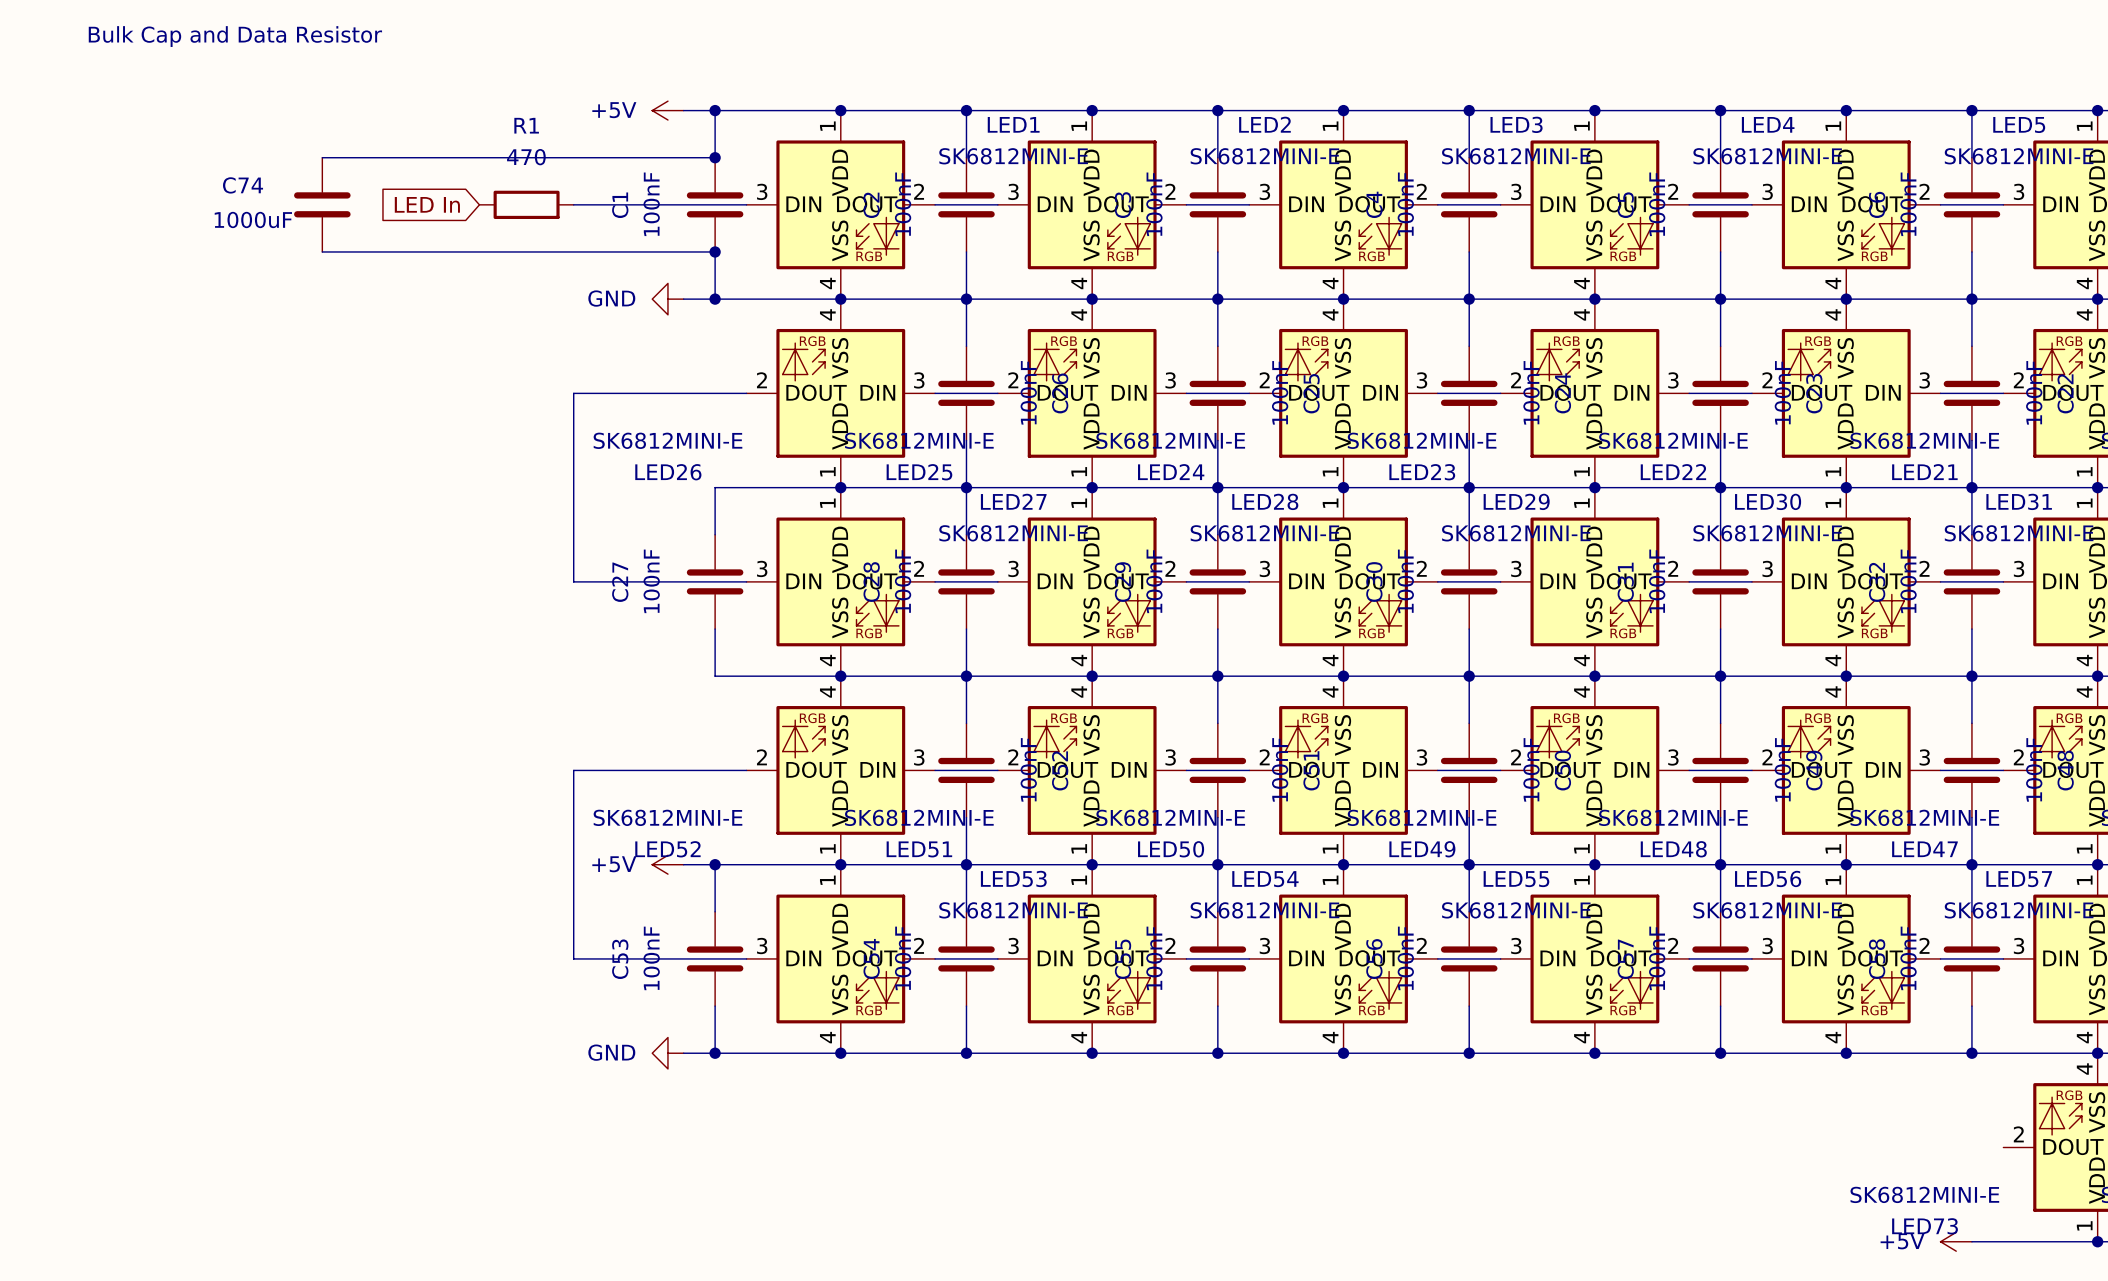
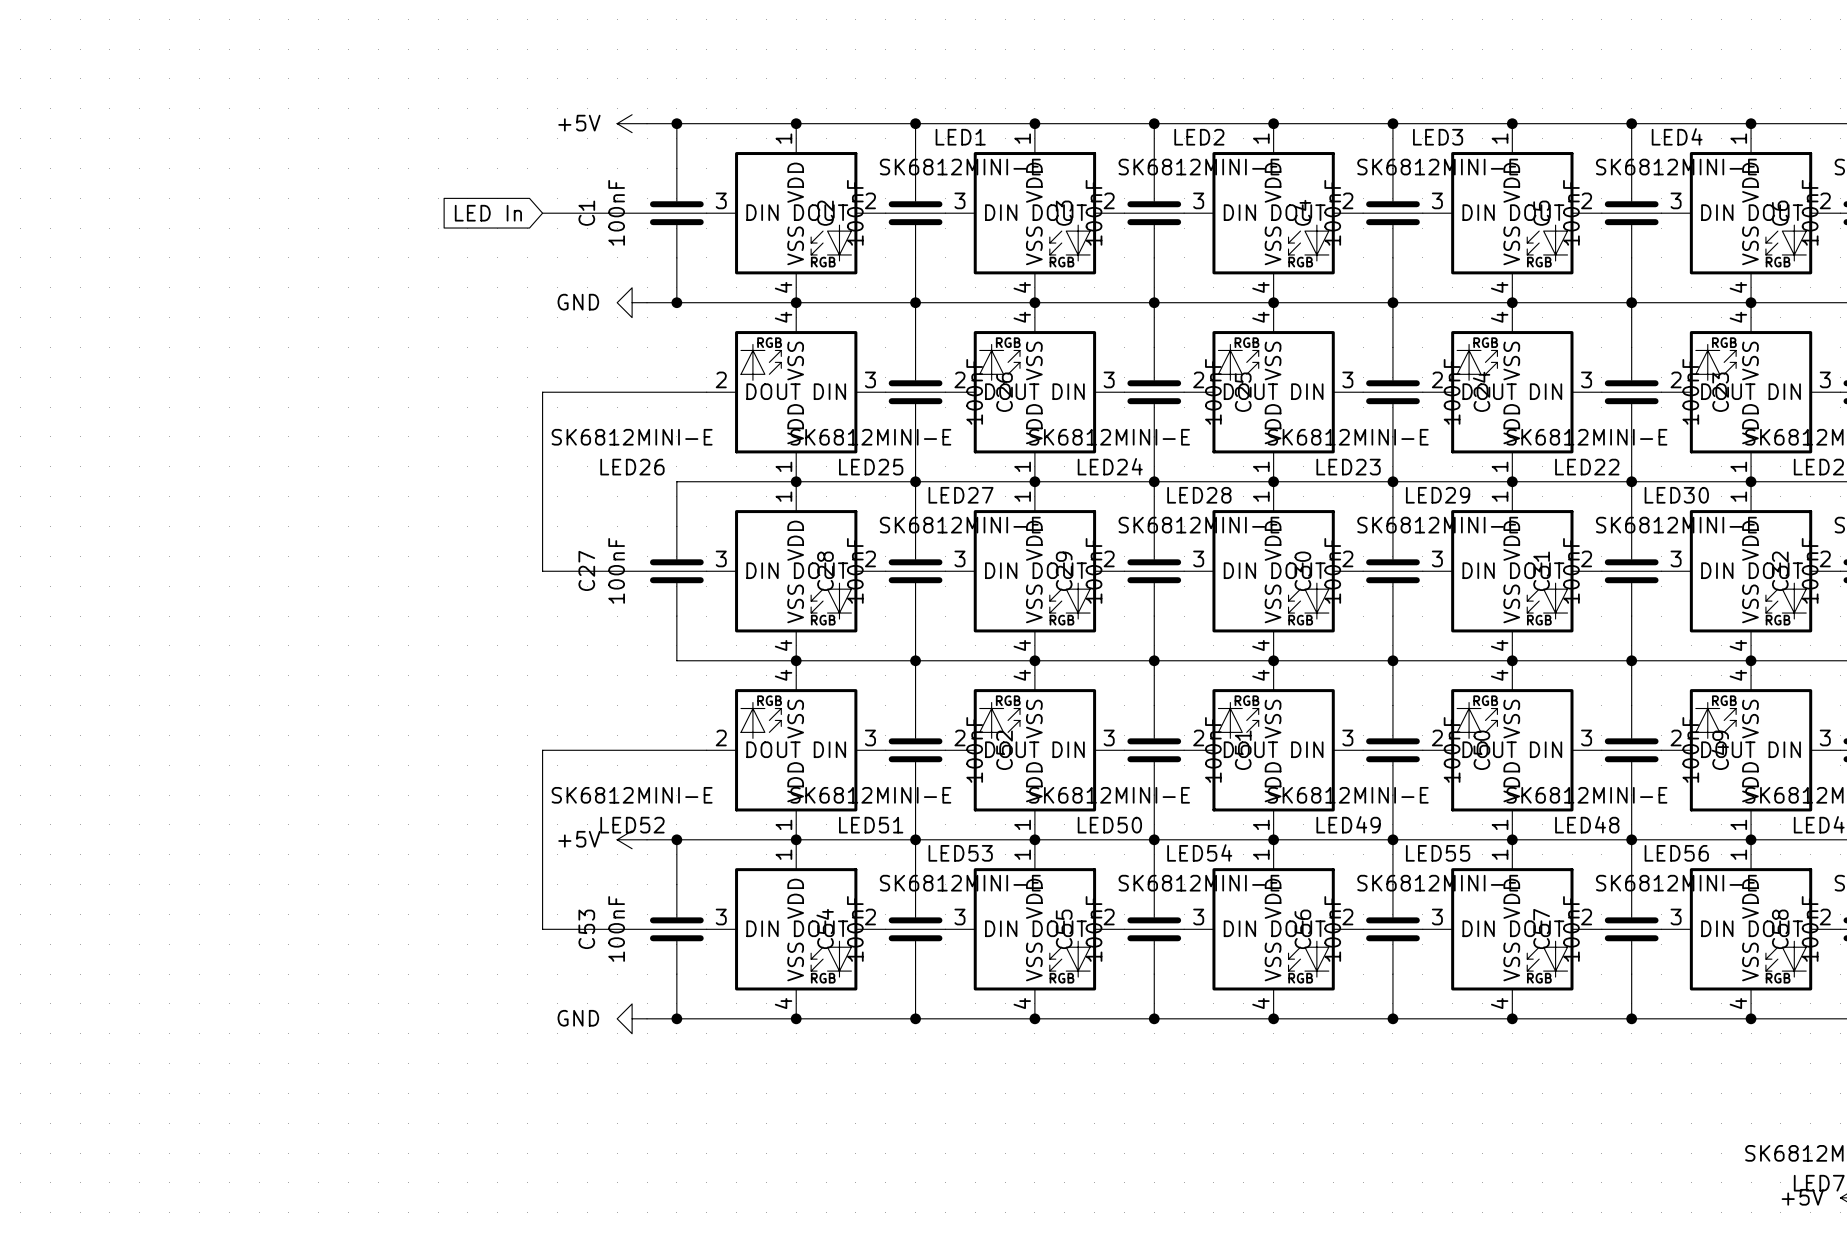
text: Bulk Cap and Data Resistor (235, 36) -> none
wire: (322, 157) (715, 157) -> none
junction: (715, 157) -> none
C74: 1000uF (322, 204) -> none
global label position: LED In (427, 204) -> LED In (488, 213)
R1: 470 (526, 204) -> none
wire: (322, 251) (715, 251) -> none
junction: (715, 251) -> none

